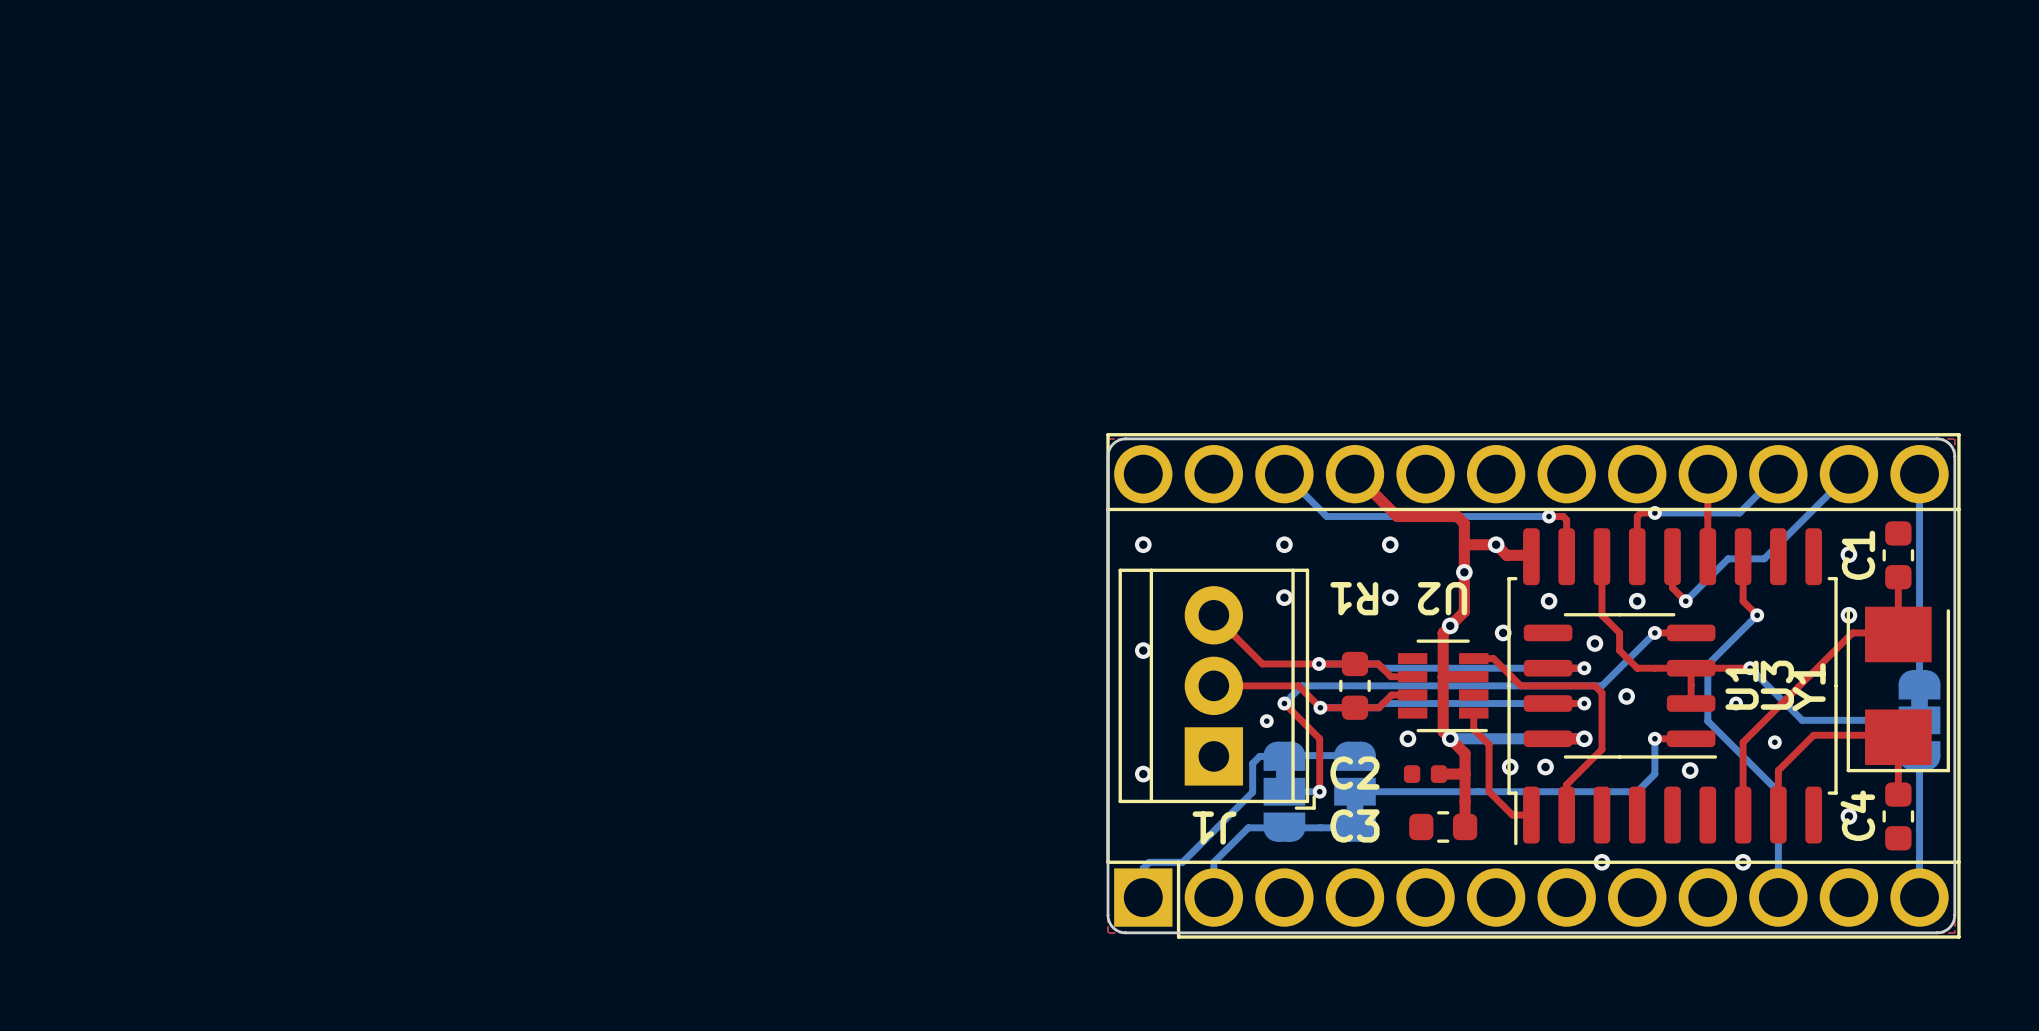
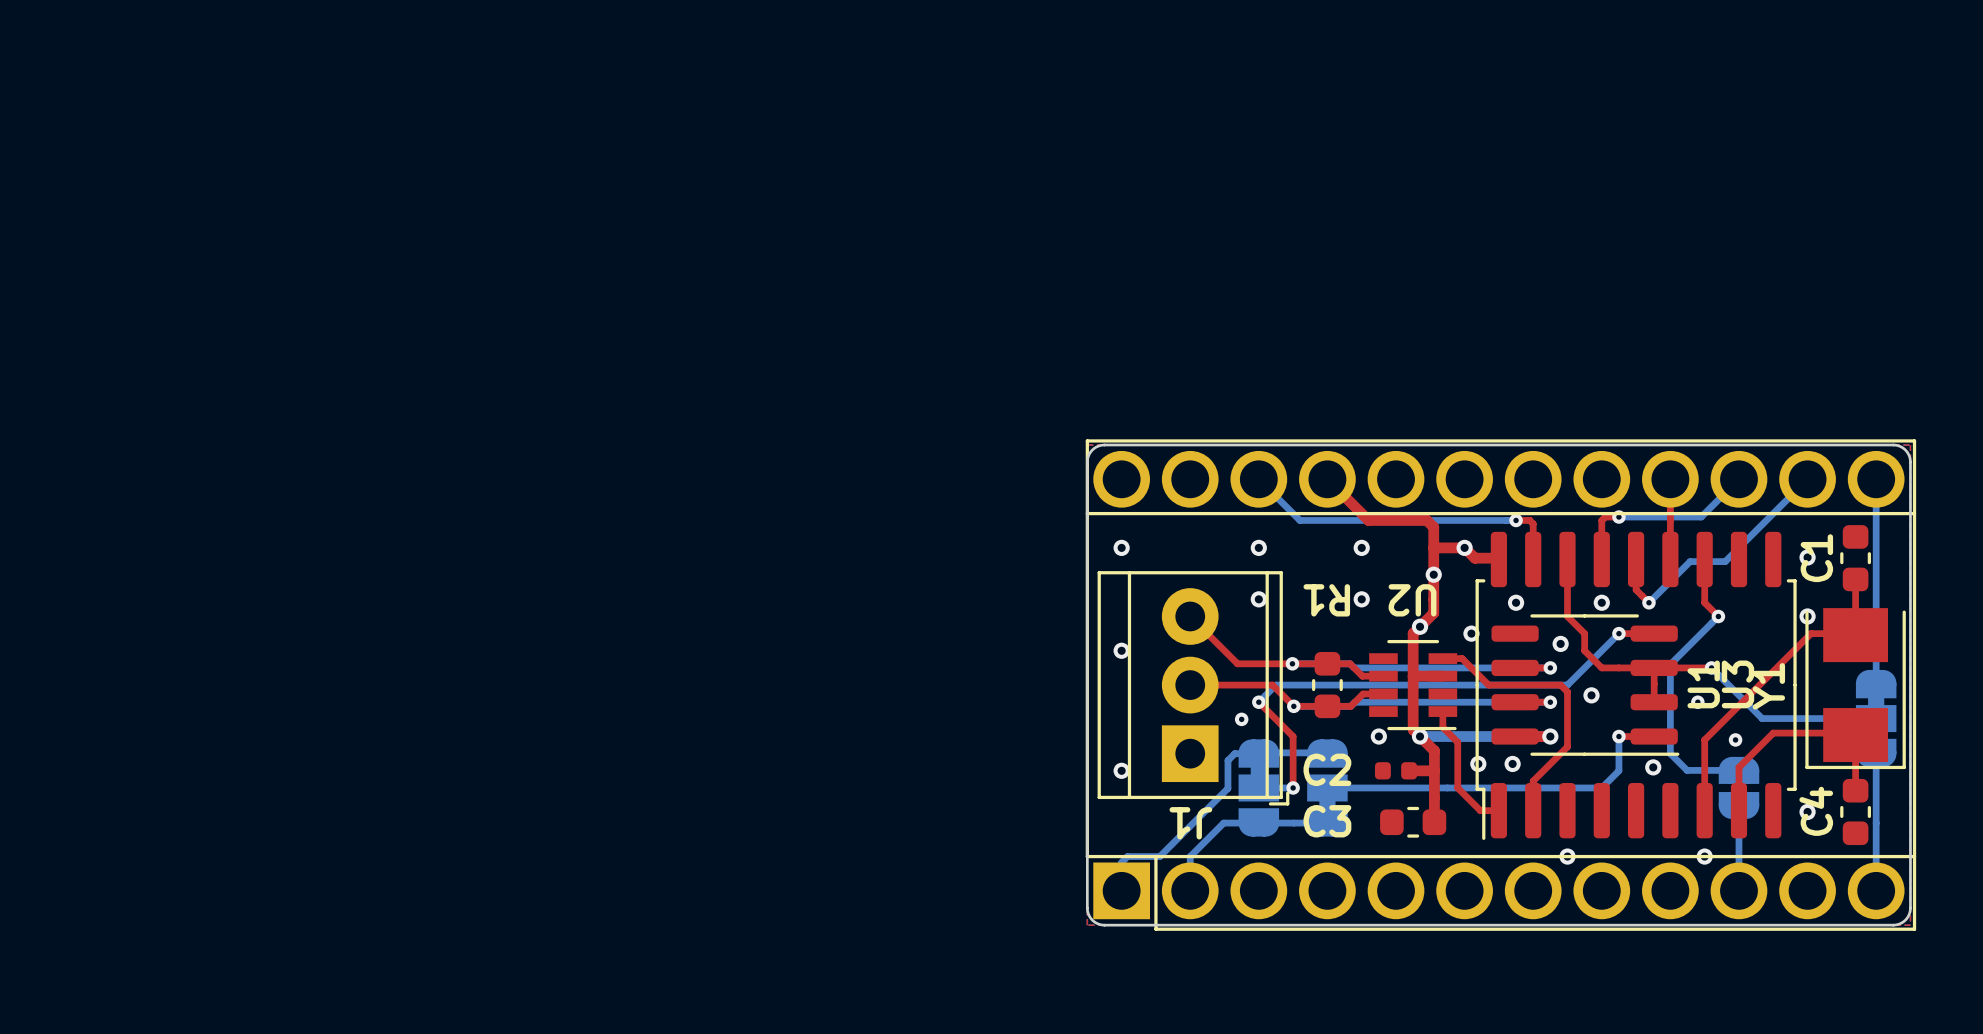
bottom track: (1707, 721) (1778, 791) (1778, 809) -> (1670, 719) (1670, 753) (1687, 770) (1738, 770)
part: none -> (1738, 787)

